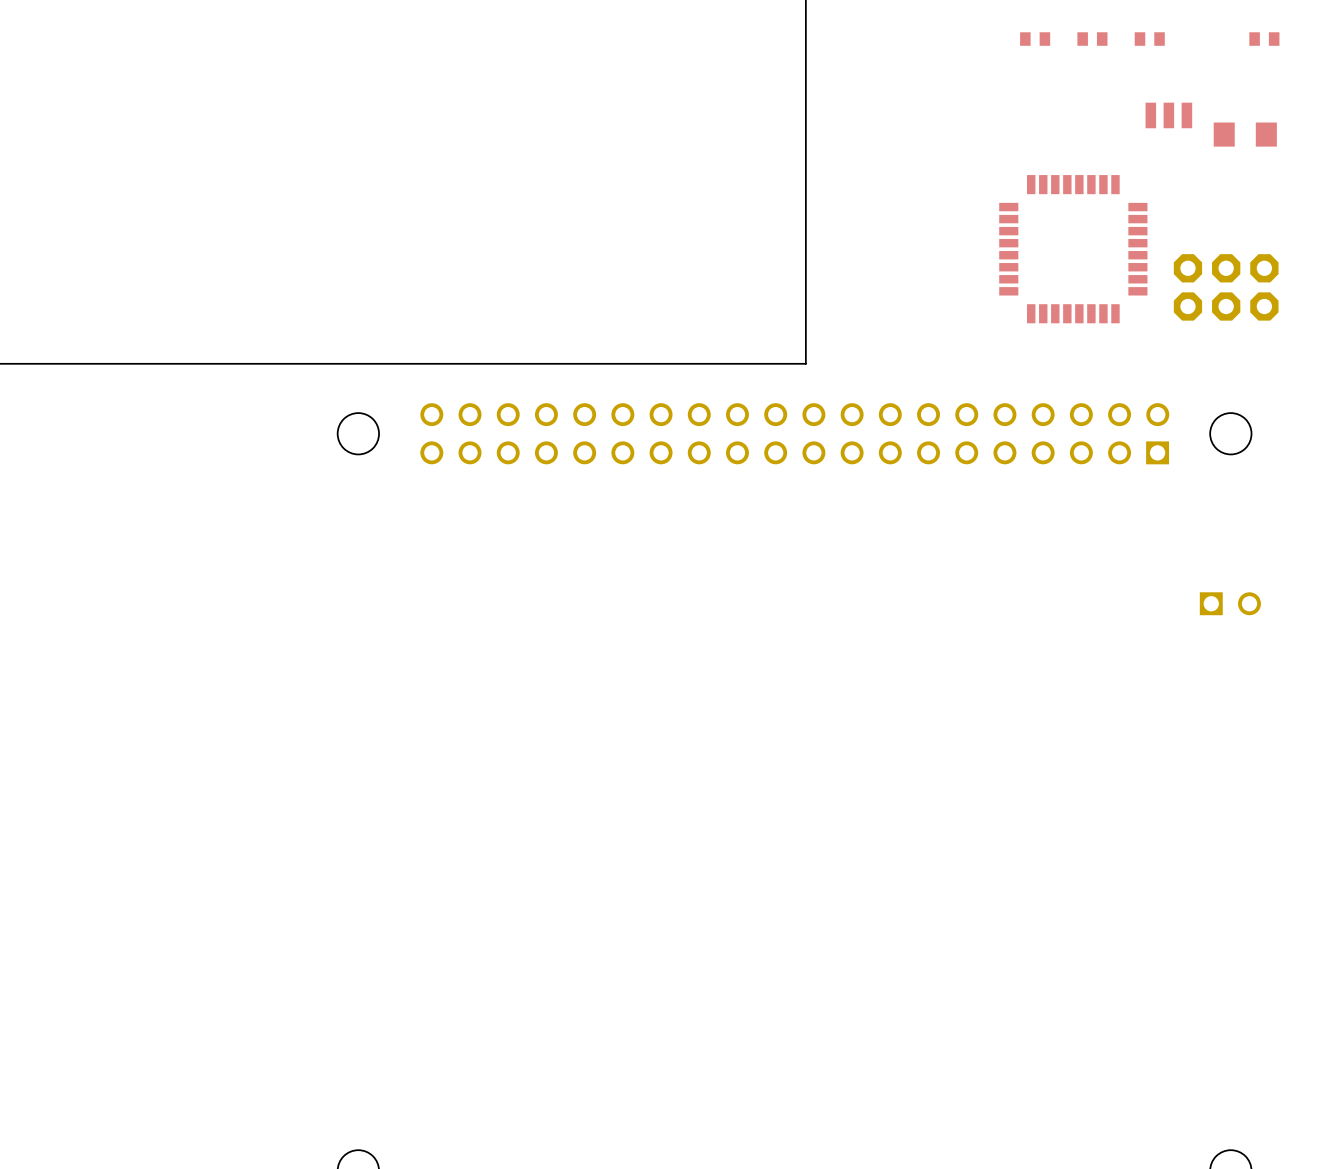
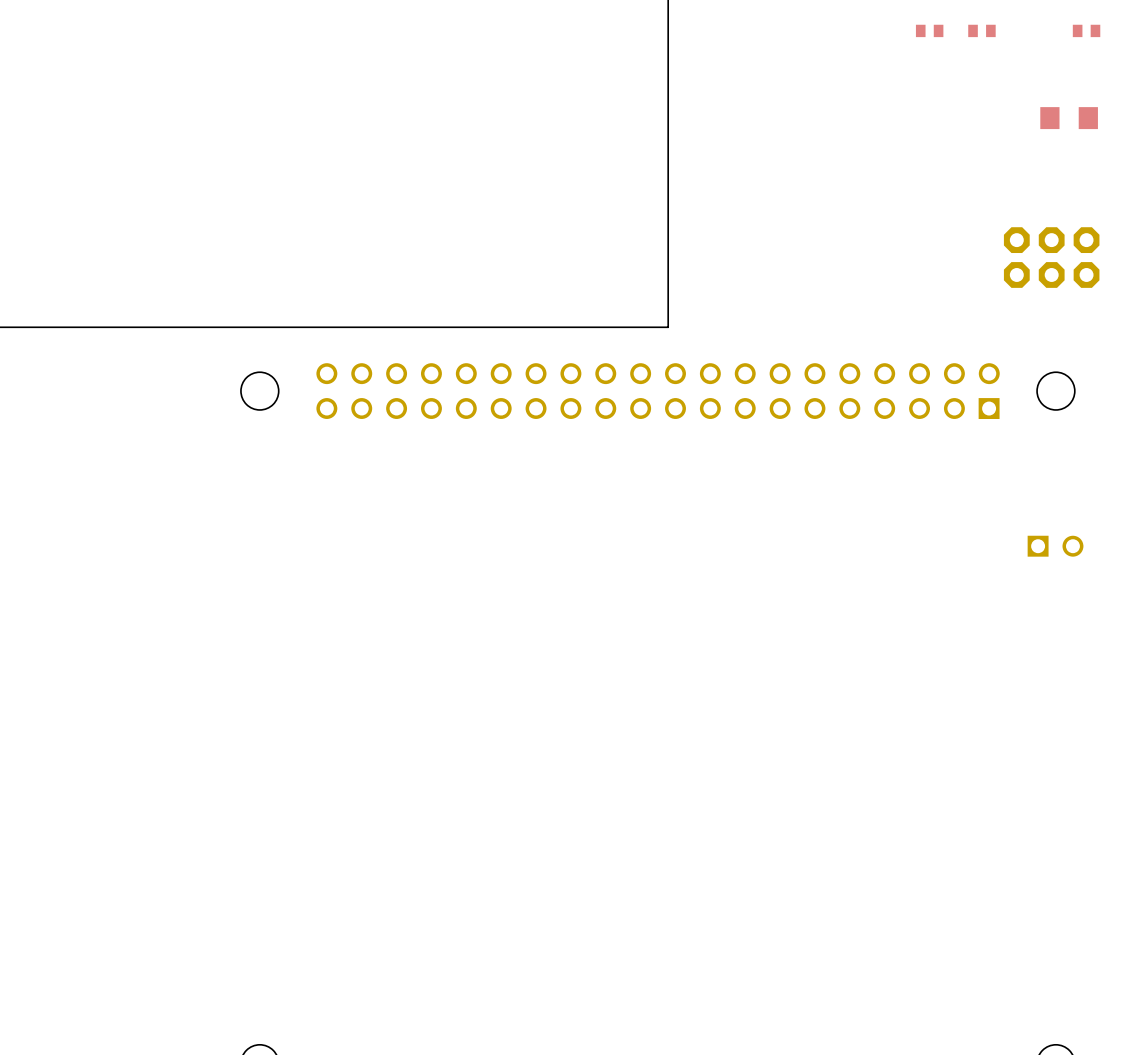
part: (1035, 39) -> none
part: (1168, 115) -> none
part: (1073, 249) -> none

